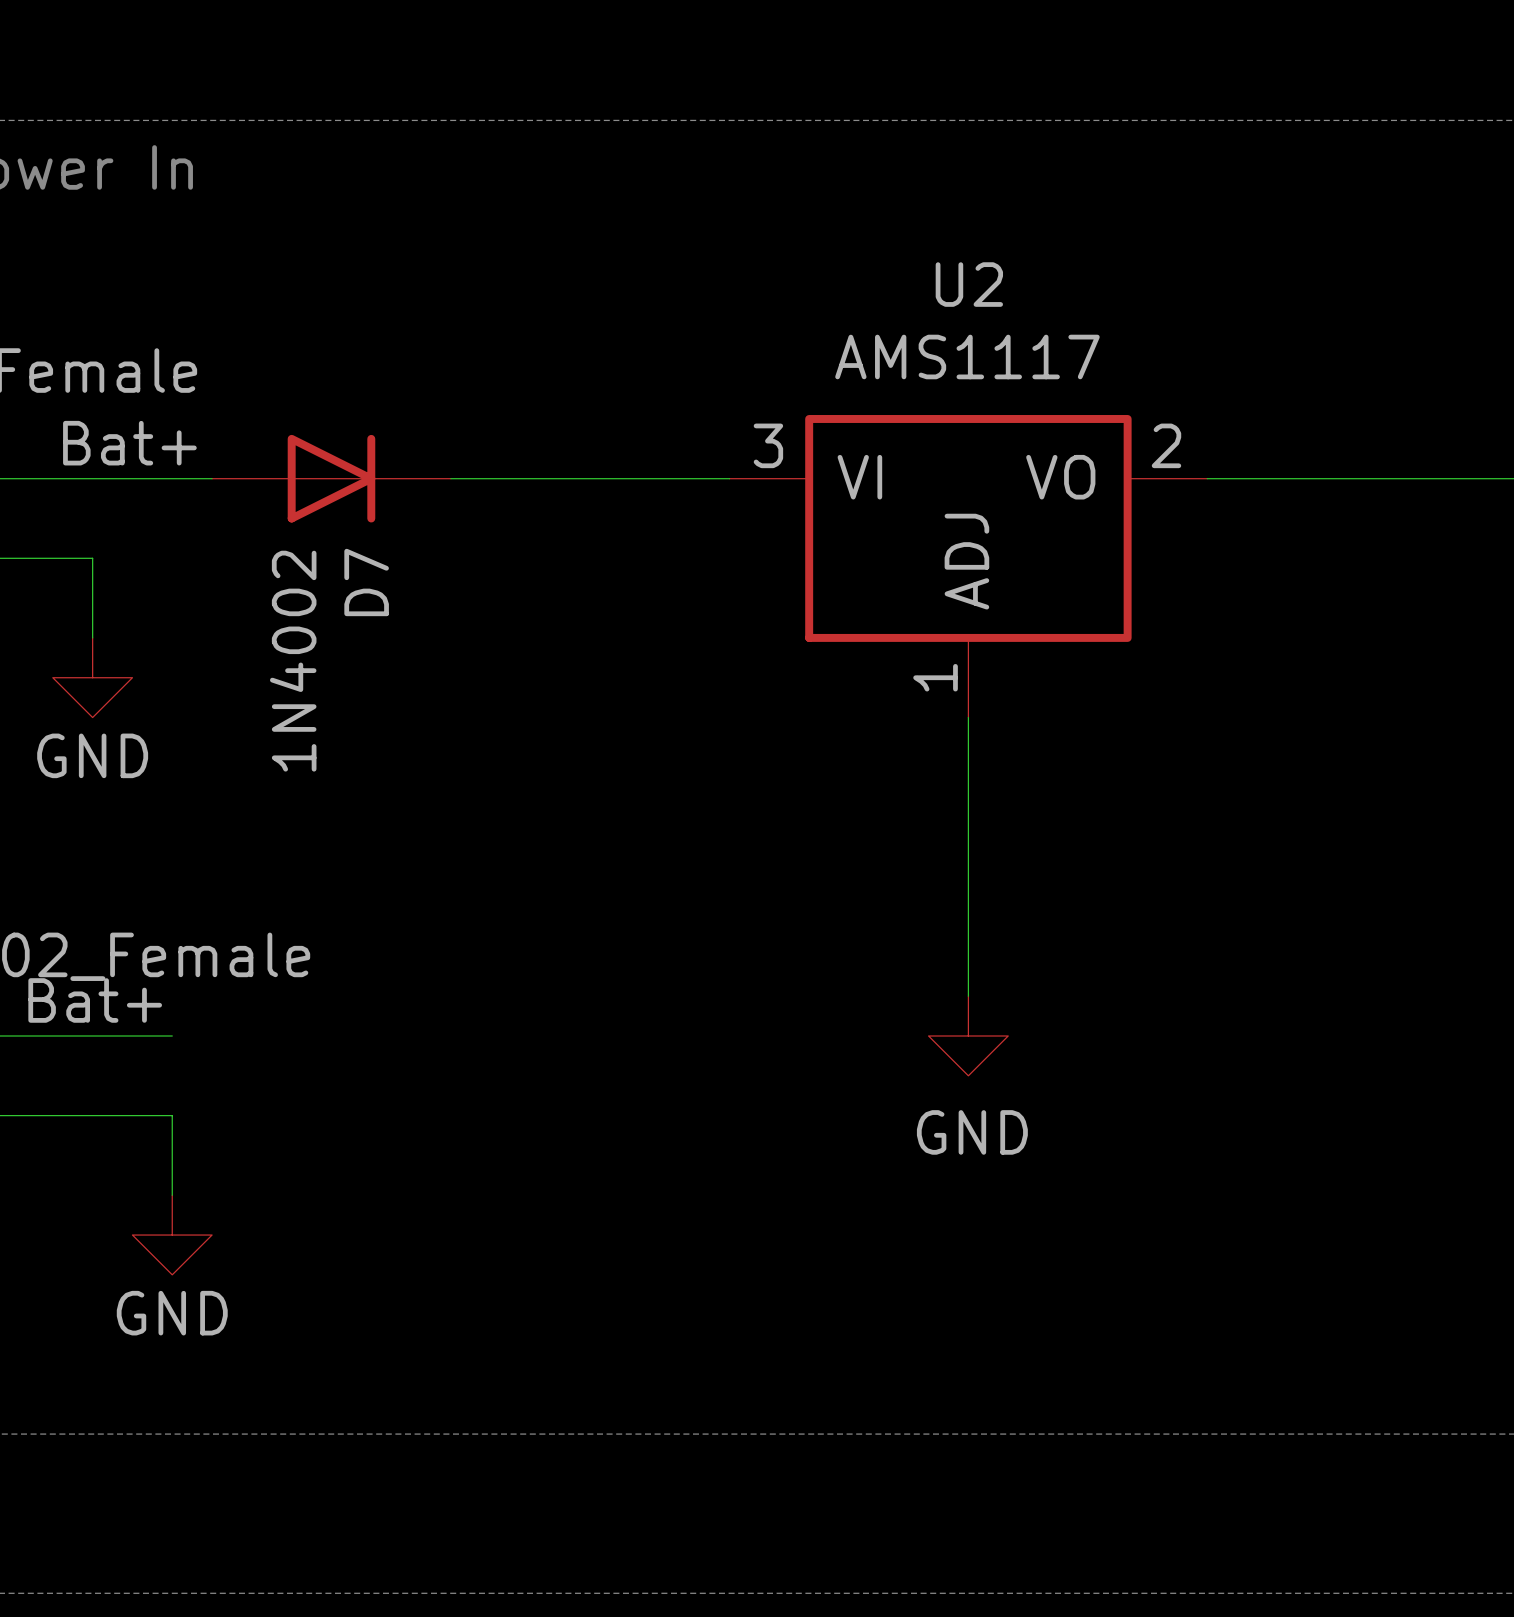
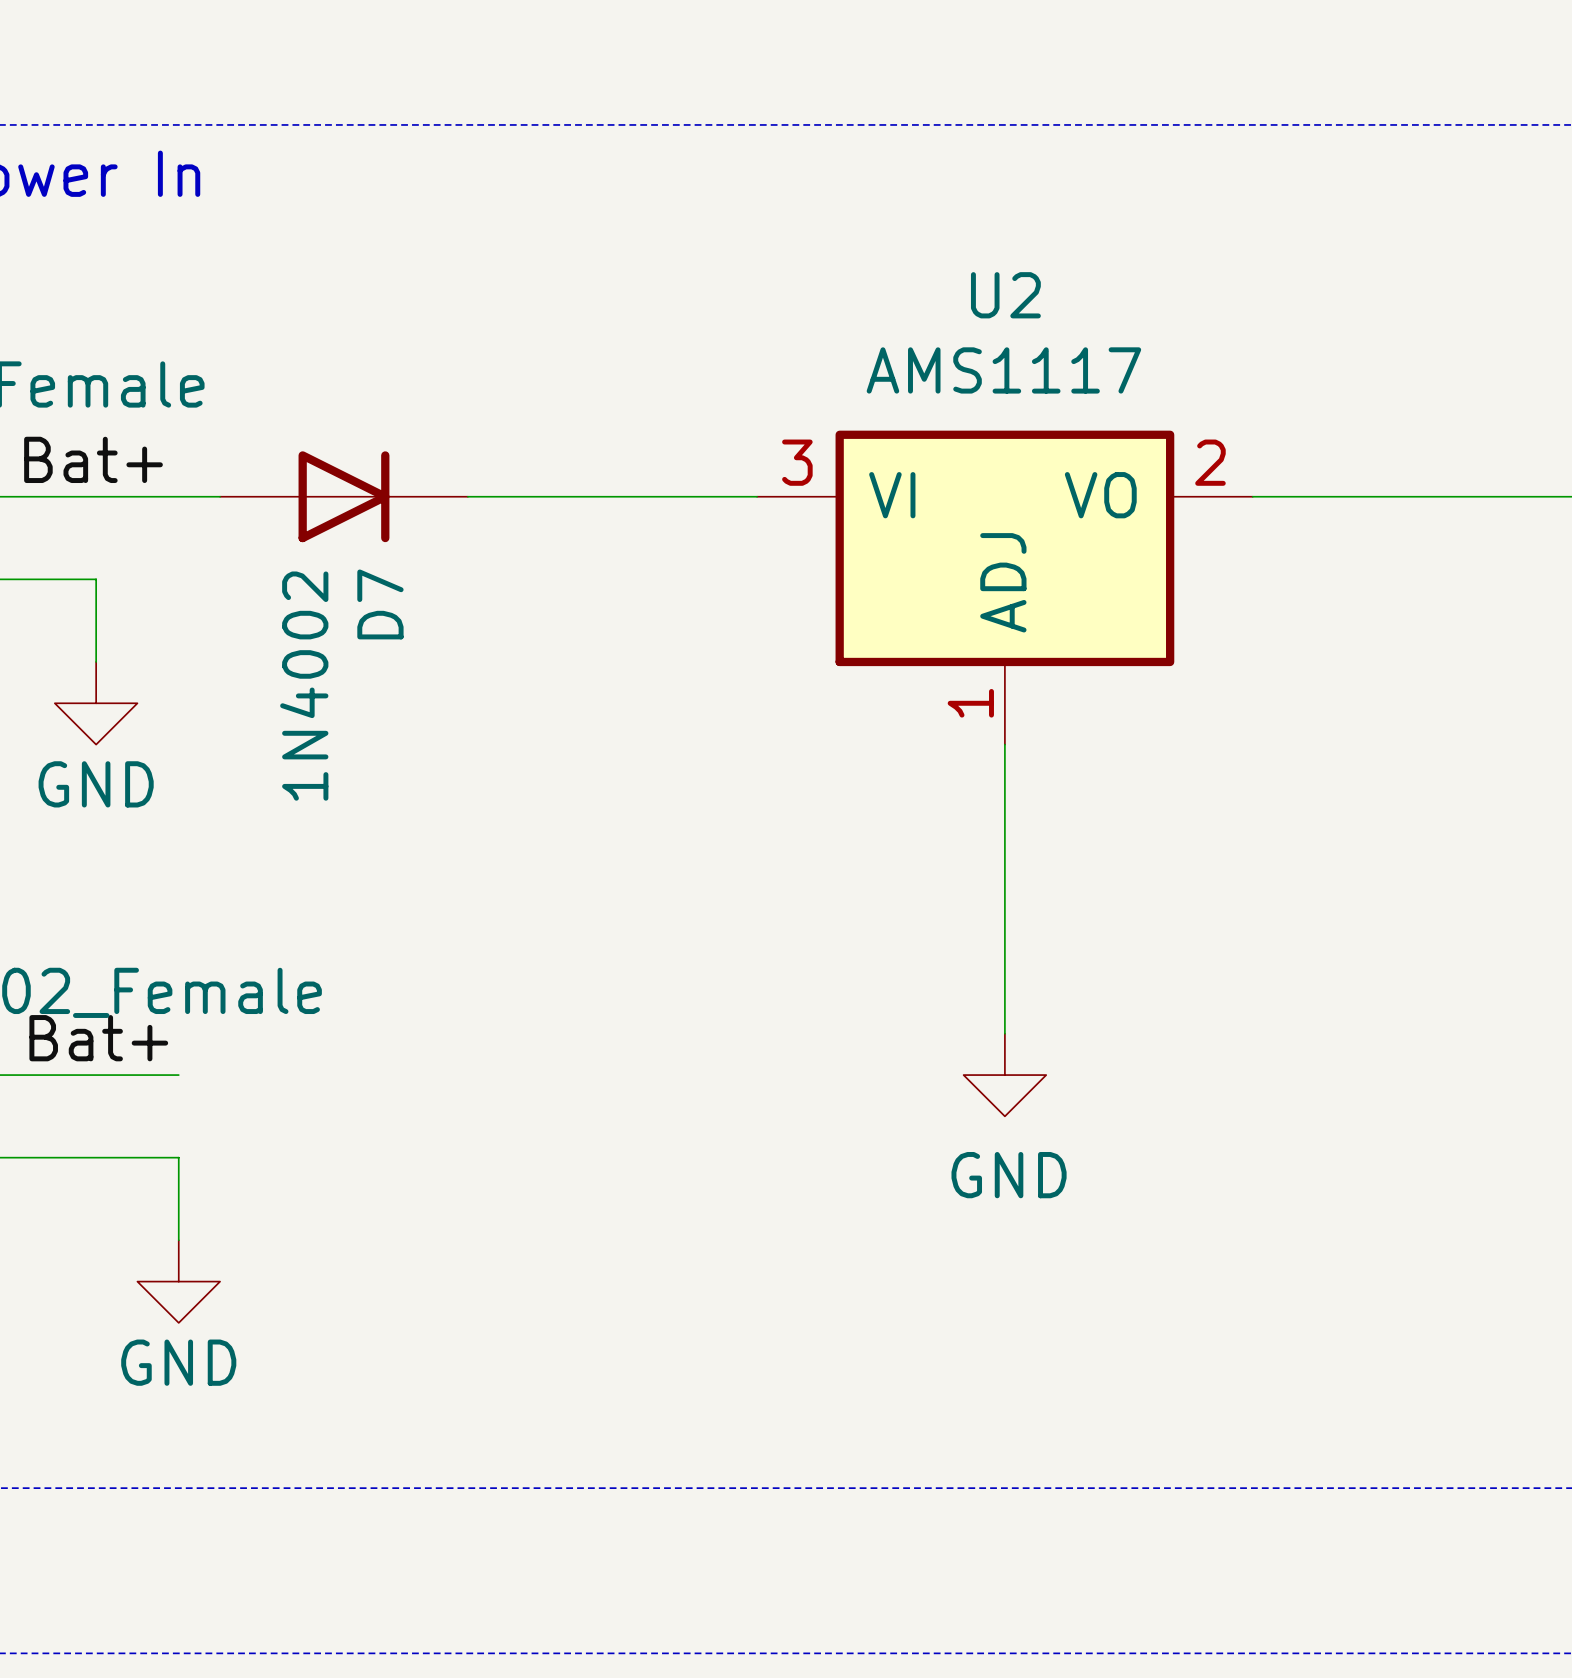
label position: Bat+ (129, 443) -> Bat+ (93, 459)

